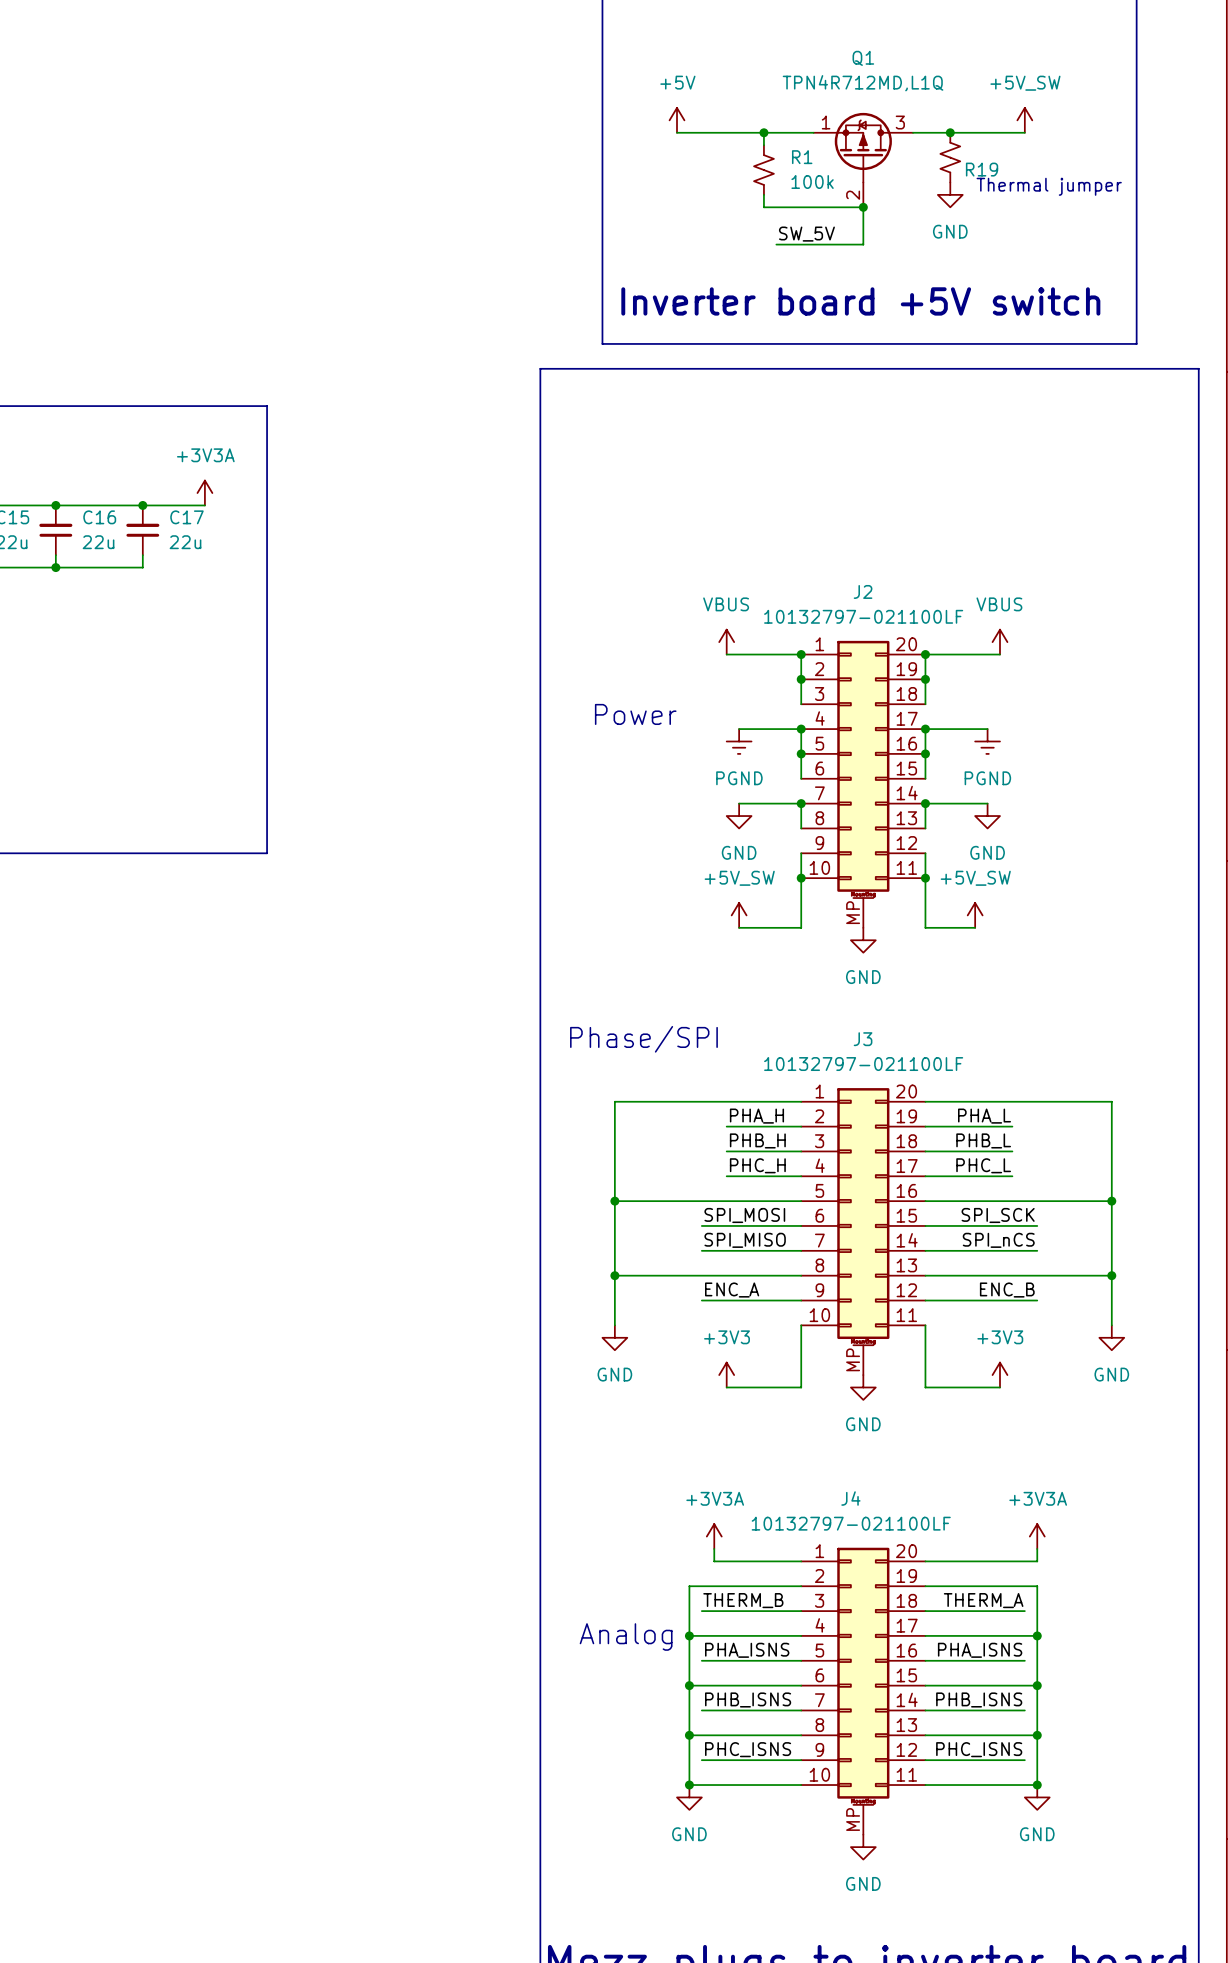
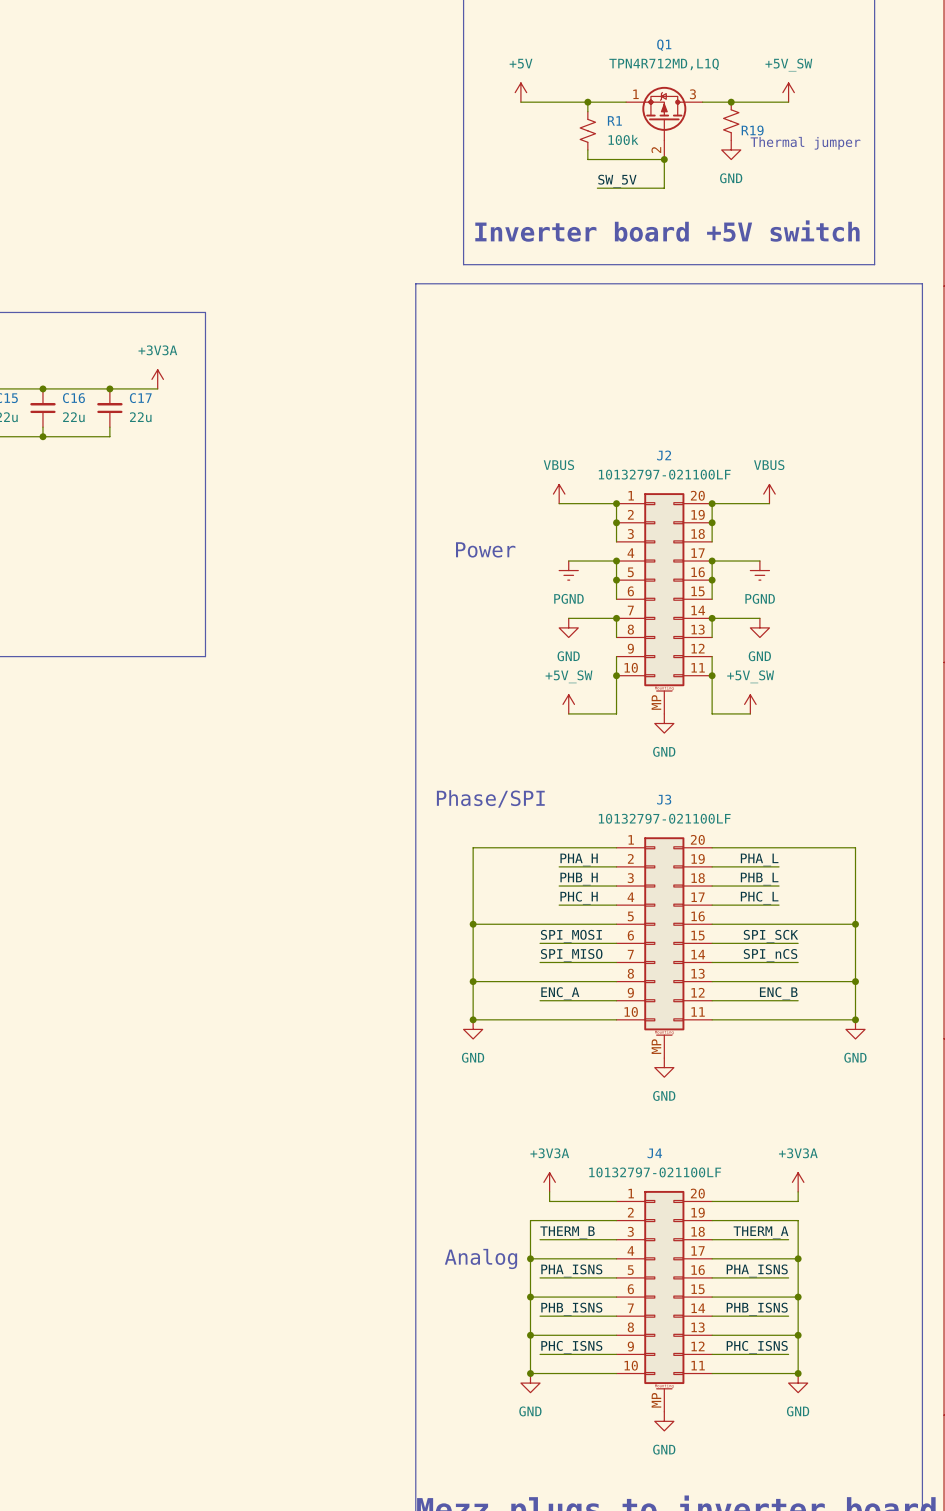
junction: none -> (473, 1019)
wire: (801, 1325) (801, 1387) (726, 1387) -> (616, 1019) (473, 1019)
wire: (925, 1325) (925, 1387) (999, 1387) -> (712, 1019) (855, 1019)
junction: none -> (855, 1019)
power symbol: +3V3 (726, 1375) -> none
power symbol: +3V3 (999, 1375) -> none

